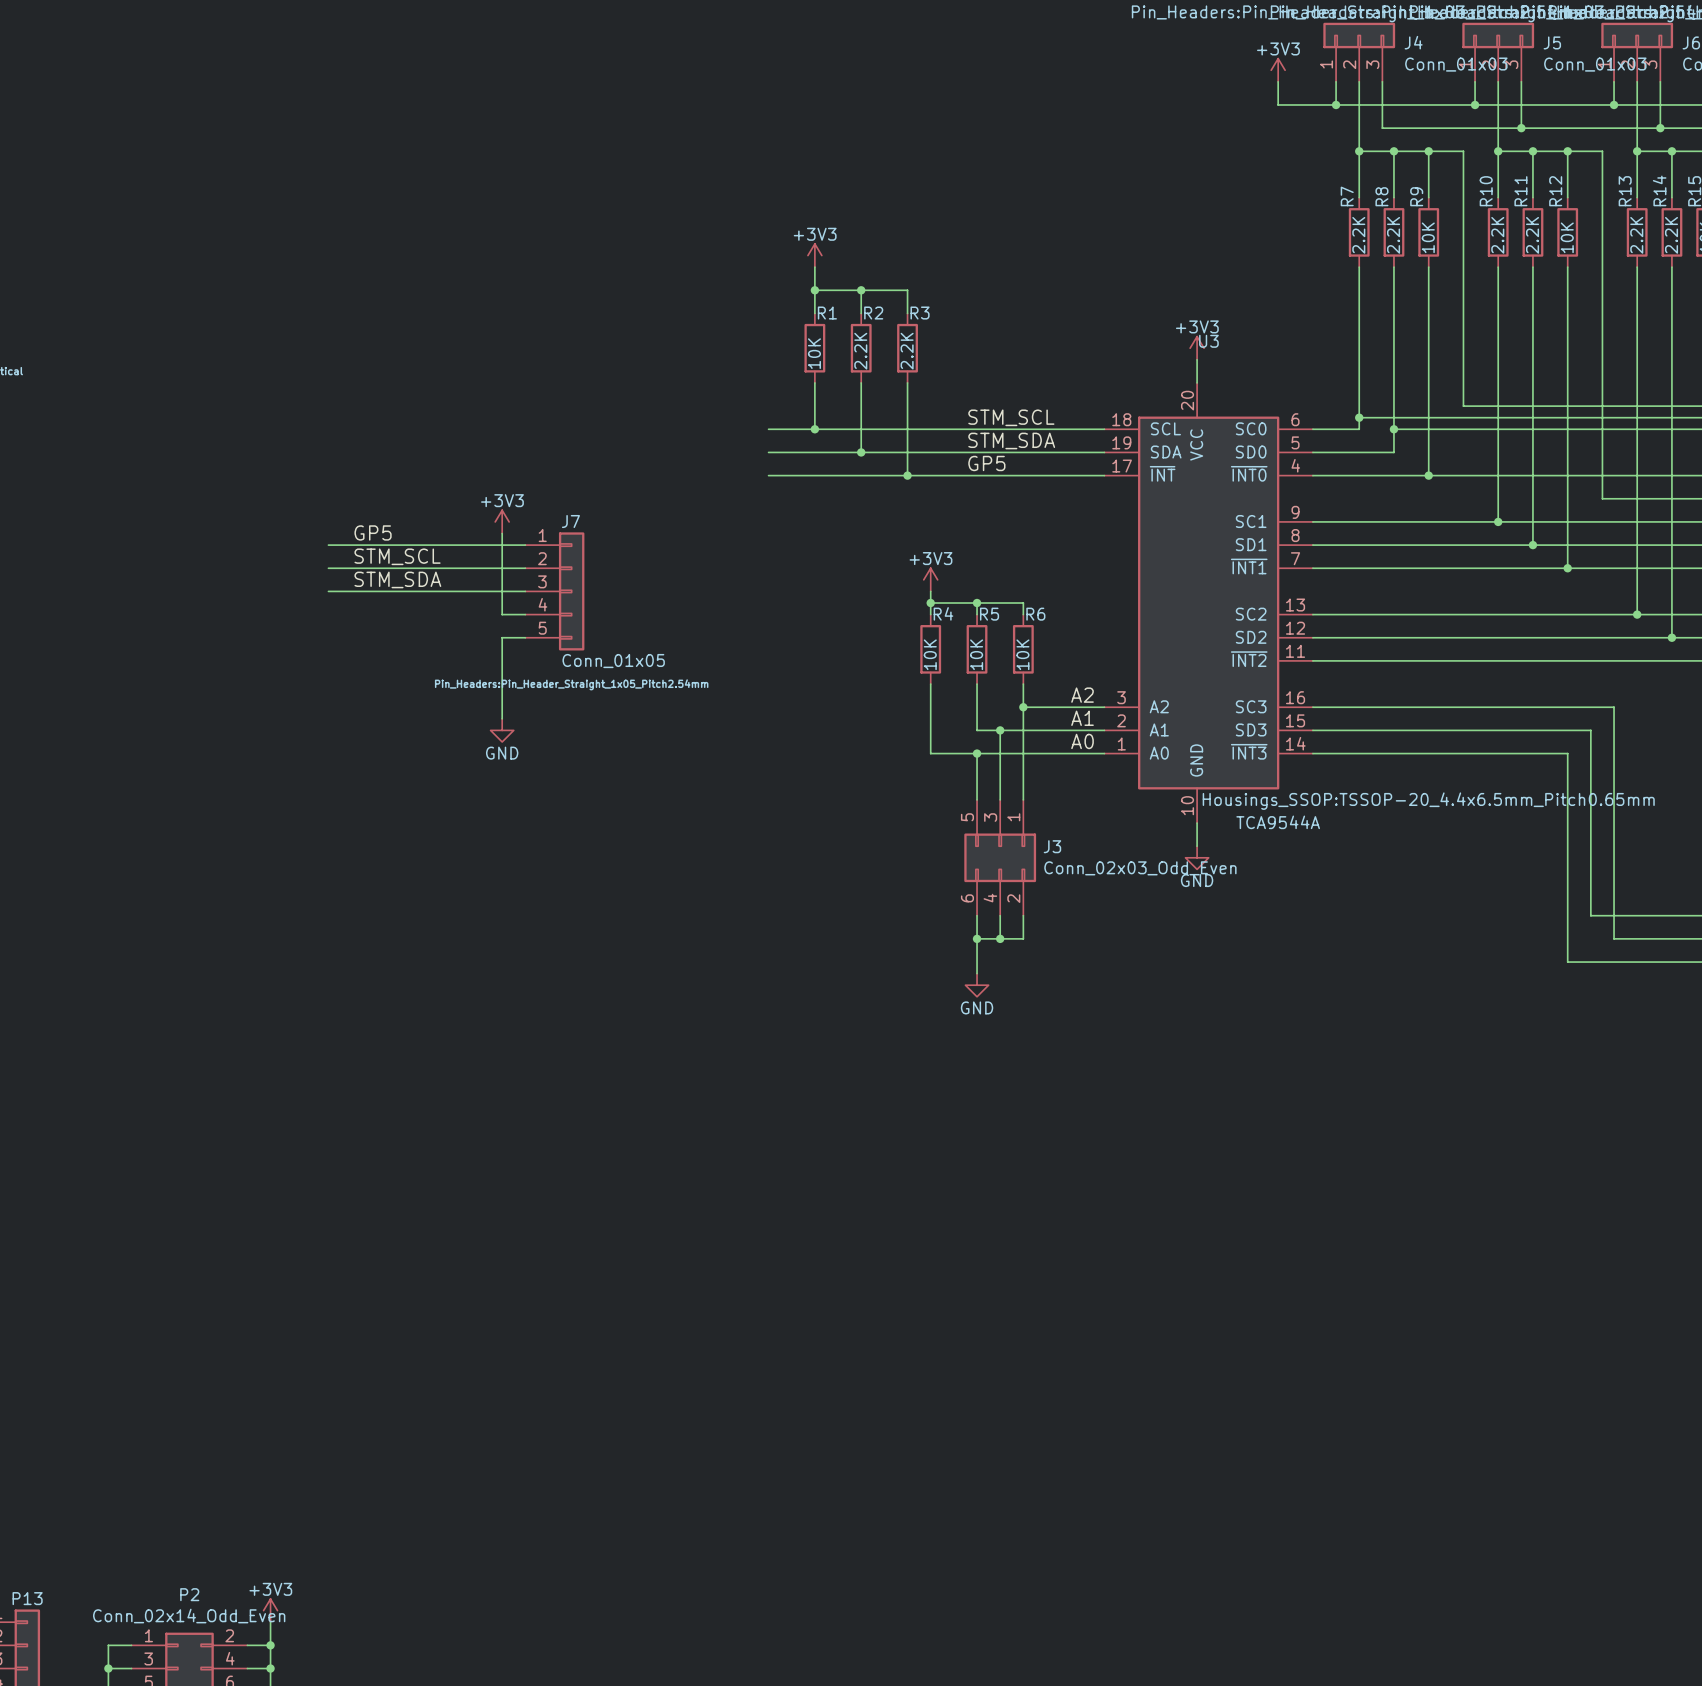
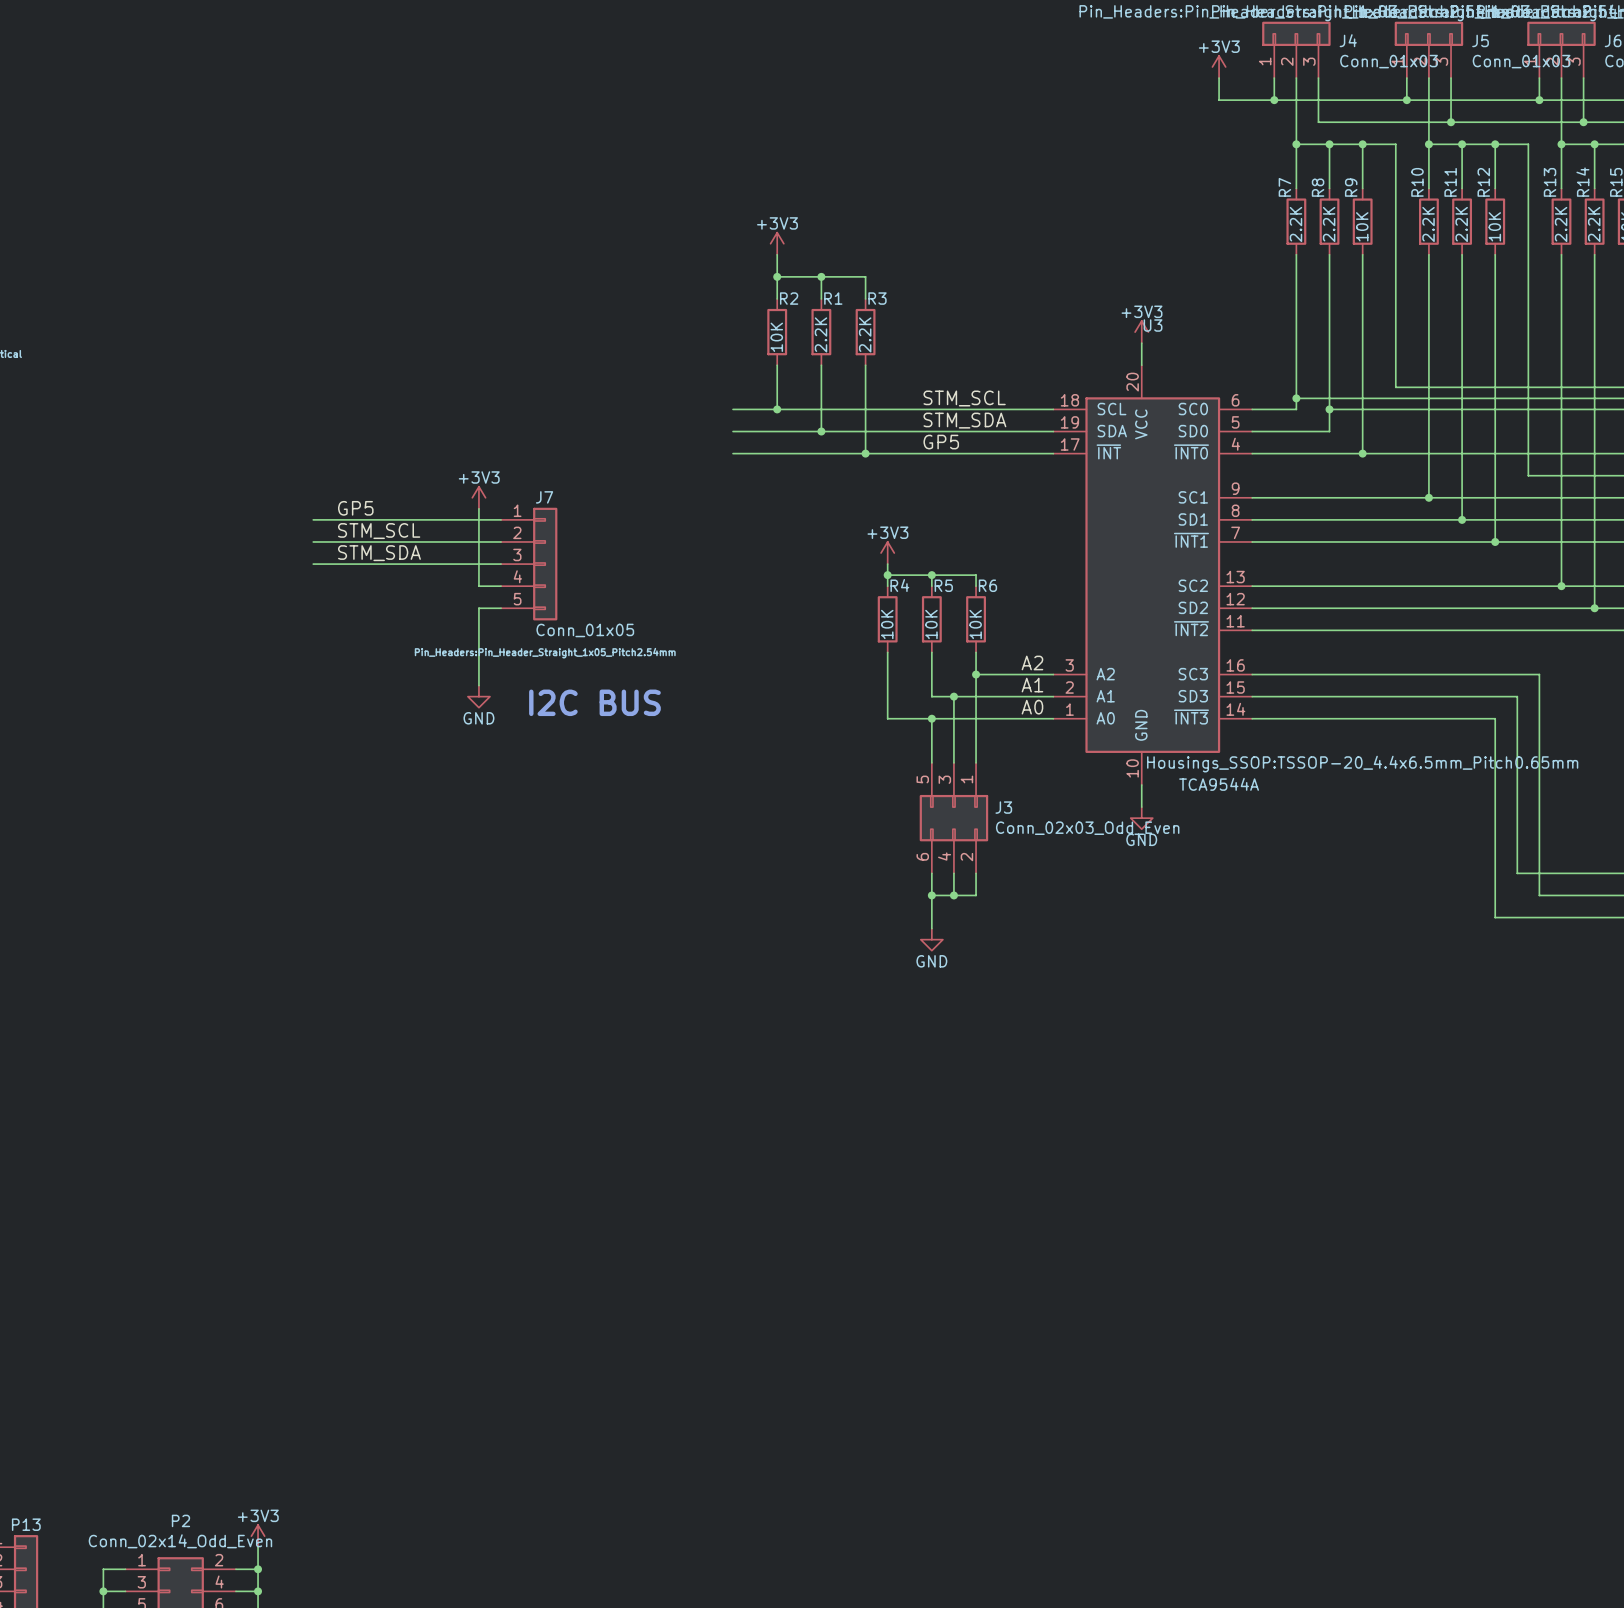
R1 name: R1 (827, 313) -> R2 (789, 298)
R2 name: R2 (873, 313) -> R1 (833, 298)
text: none -> I2C BUS (594, 702)

